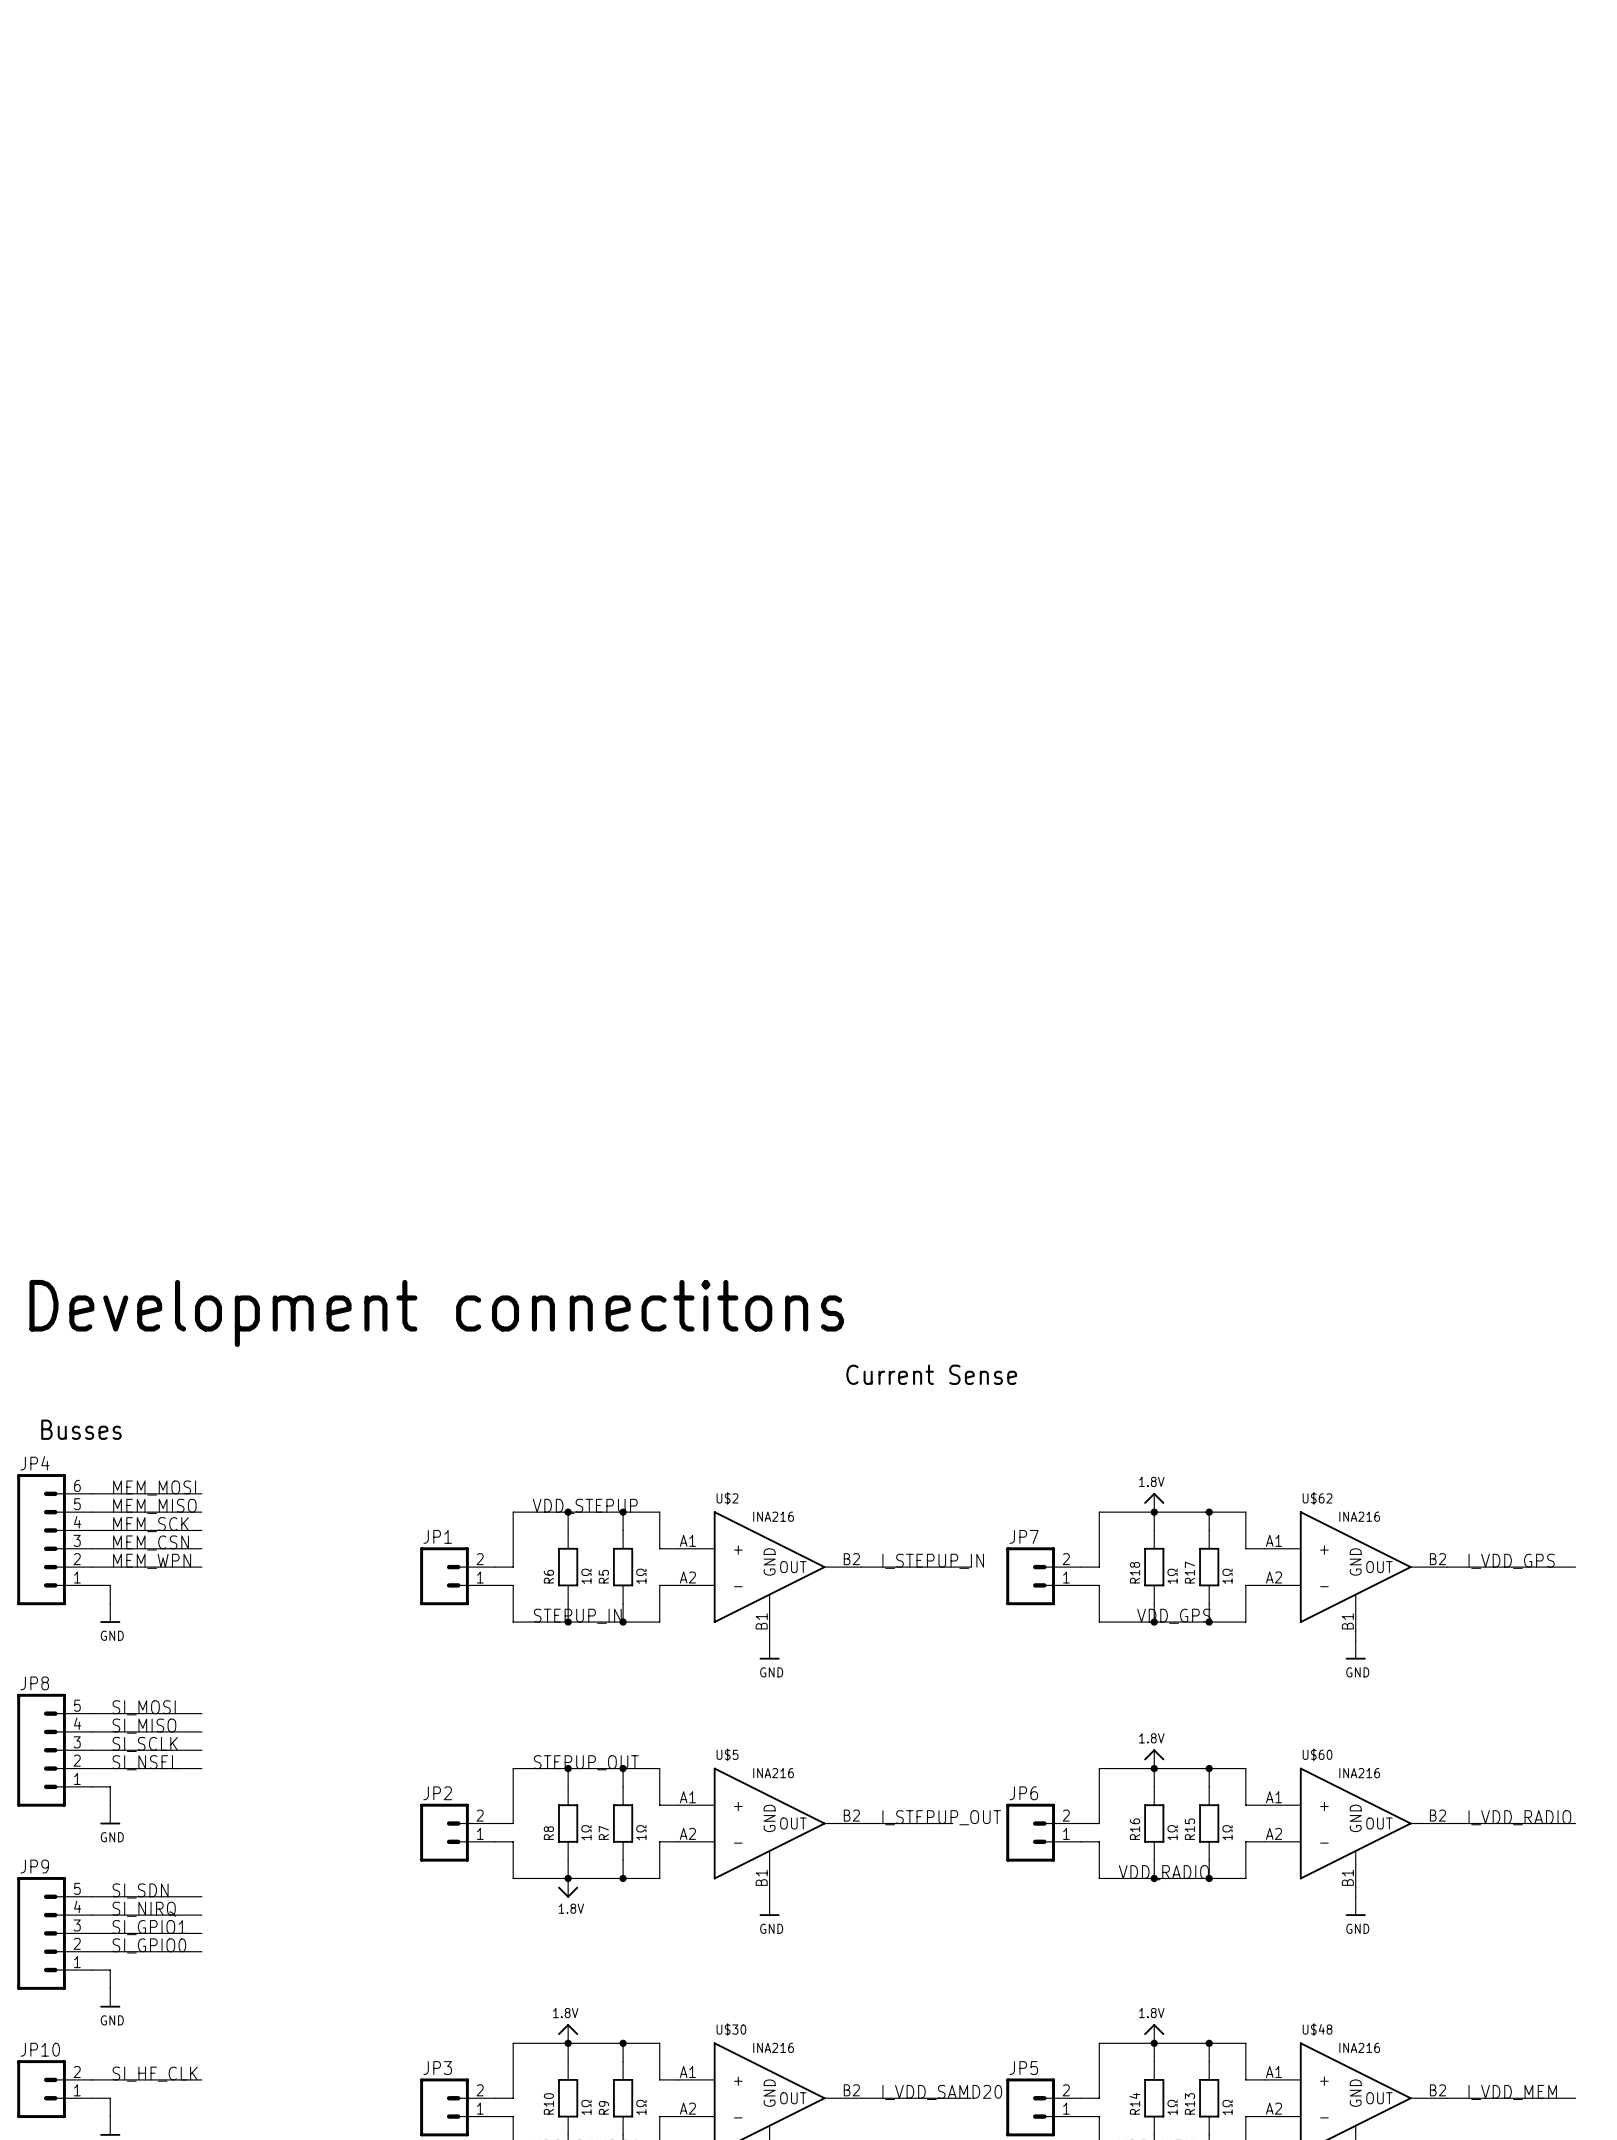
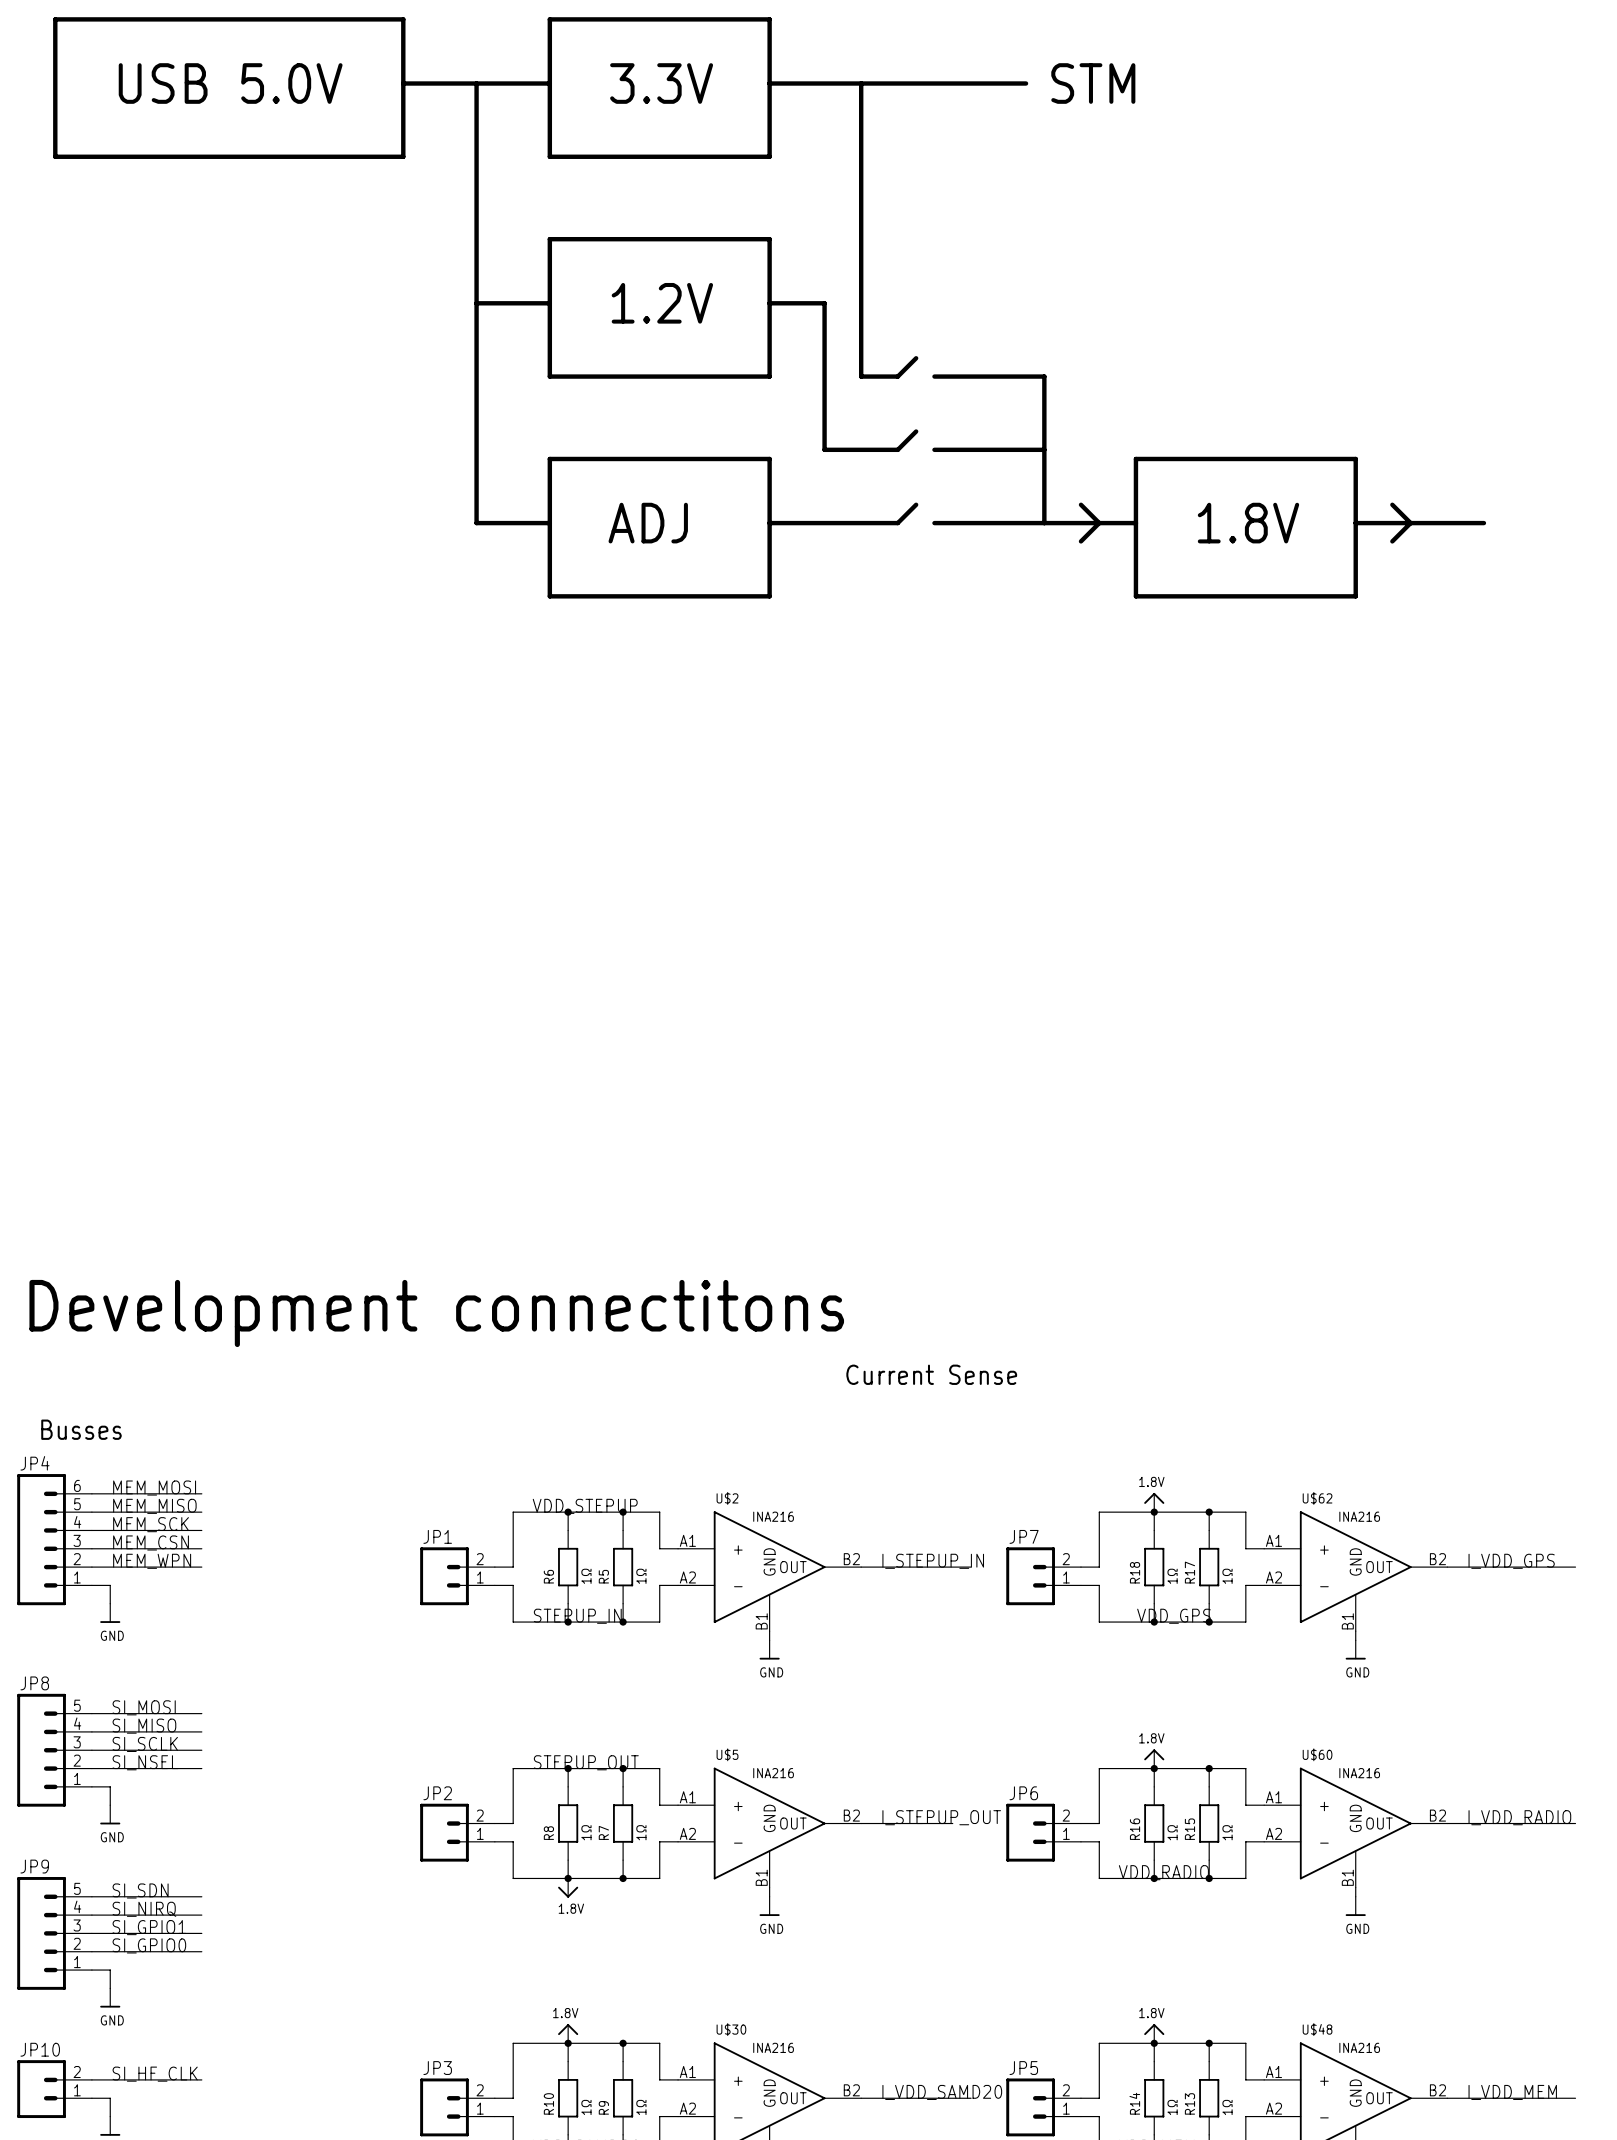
line: none -> (55, 19) (403, 19) (403, 156) (55, 156) (55, 19)
line: none -> (549, 19) (769, 19) (769, 156) (549, 156) (549, 19)
text: none -> USB 5.0V (230, 83)
line: none -> (403, 83) (549, 83)
line: none -> (476, 83) (476, 523) (549, 523)
text: none -> 3.3V (661, 83)
line: none -> (769, 83) (1026, 83)
line: none -> (861, 83) (861, 376) (897, 376) (916, 358)
text: none -> STM (1093, 83)
line: none -> (549, 239) (769, 239) (769, 376) (549, 376) (549, 239)
line: none -> (476, 303) (549, 303)
text: none -> 1.2V (662, 303)
line: none -> (769, 303) (824, 303) (824, 449) (897, 449) (916, 431)
line: none -> (934, 376) (1044, 376) (1044, 523)
line: none -> (934, 449) (1044, 449)
line: none -> (549, 458) (549, 596) (769, 596) (769, 458) (549, 458)
line: none -> (1135, 458) (1355, 458) (1355, 596) (1135, 596) (1135, 458)
line: none -> (916, 504) (897, 523) (769, 523)
line: none -> (1080, 504) (1099, 523) (1080, 541)
line: none -> (1392, 504) (1410, 523) (1392, 541)
text: none -> ADJ (648, 523)
line: none -> (934, 523) (1135, 523)
text: none -> 1.8V (1248, 523)
line: none -> (1355, 523) (1483, 523)

